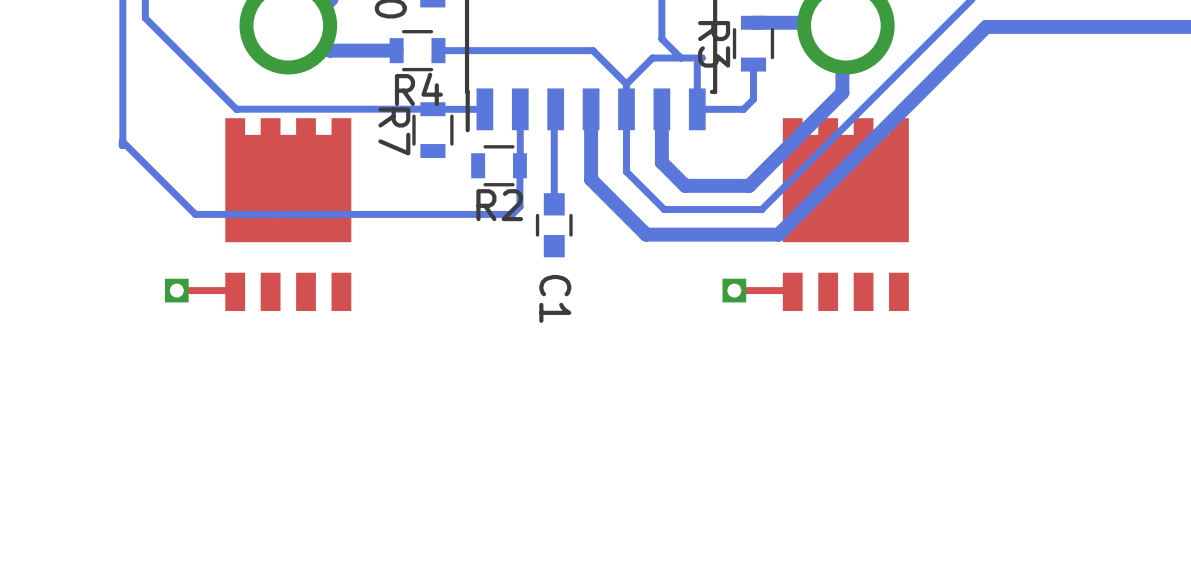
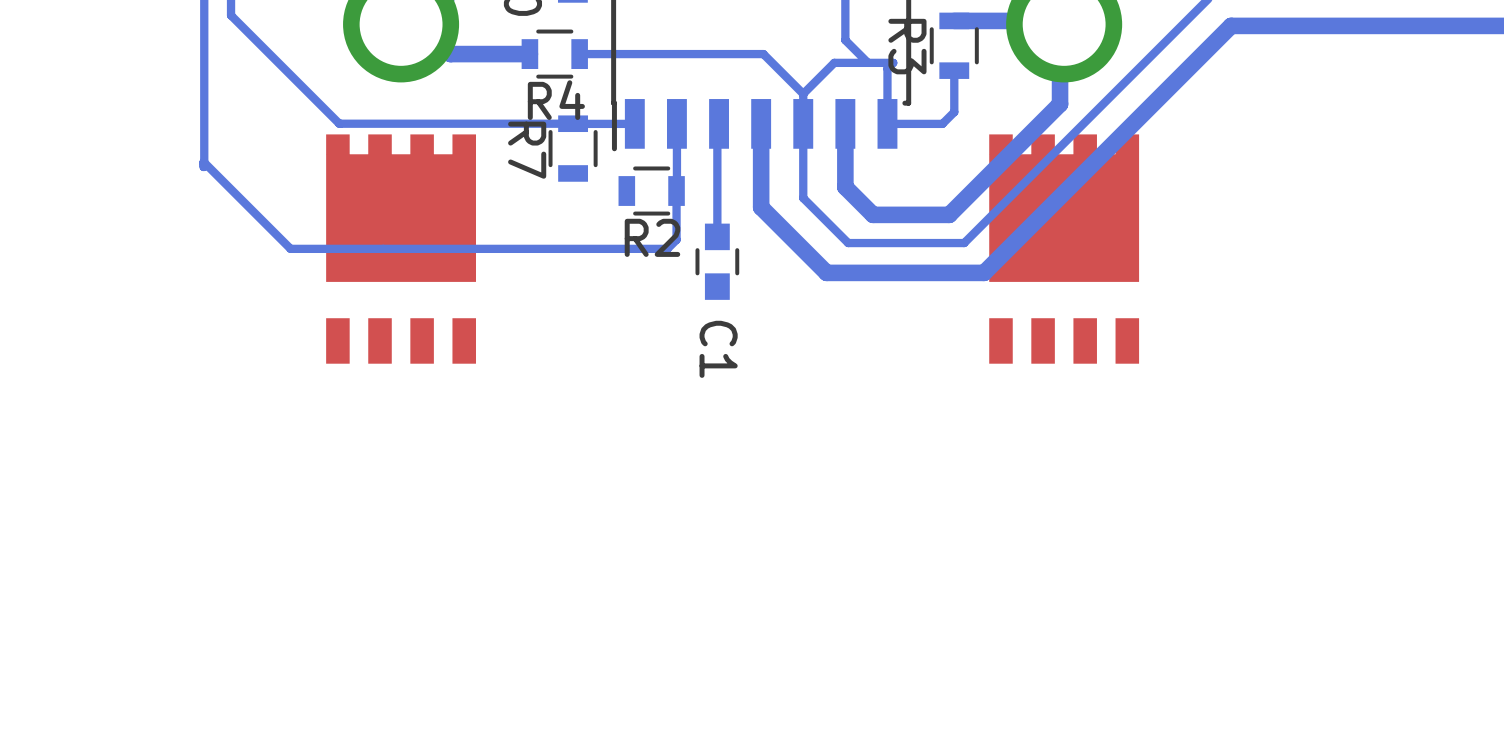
top track: (176, 290) (235, 291) -> none
part: (176, 290) -> none
top track: (734, 290) (792, 291) -> none
part: (734, 290) -> none

